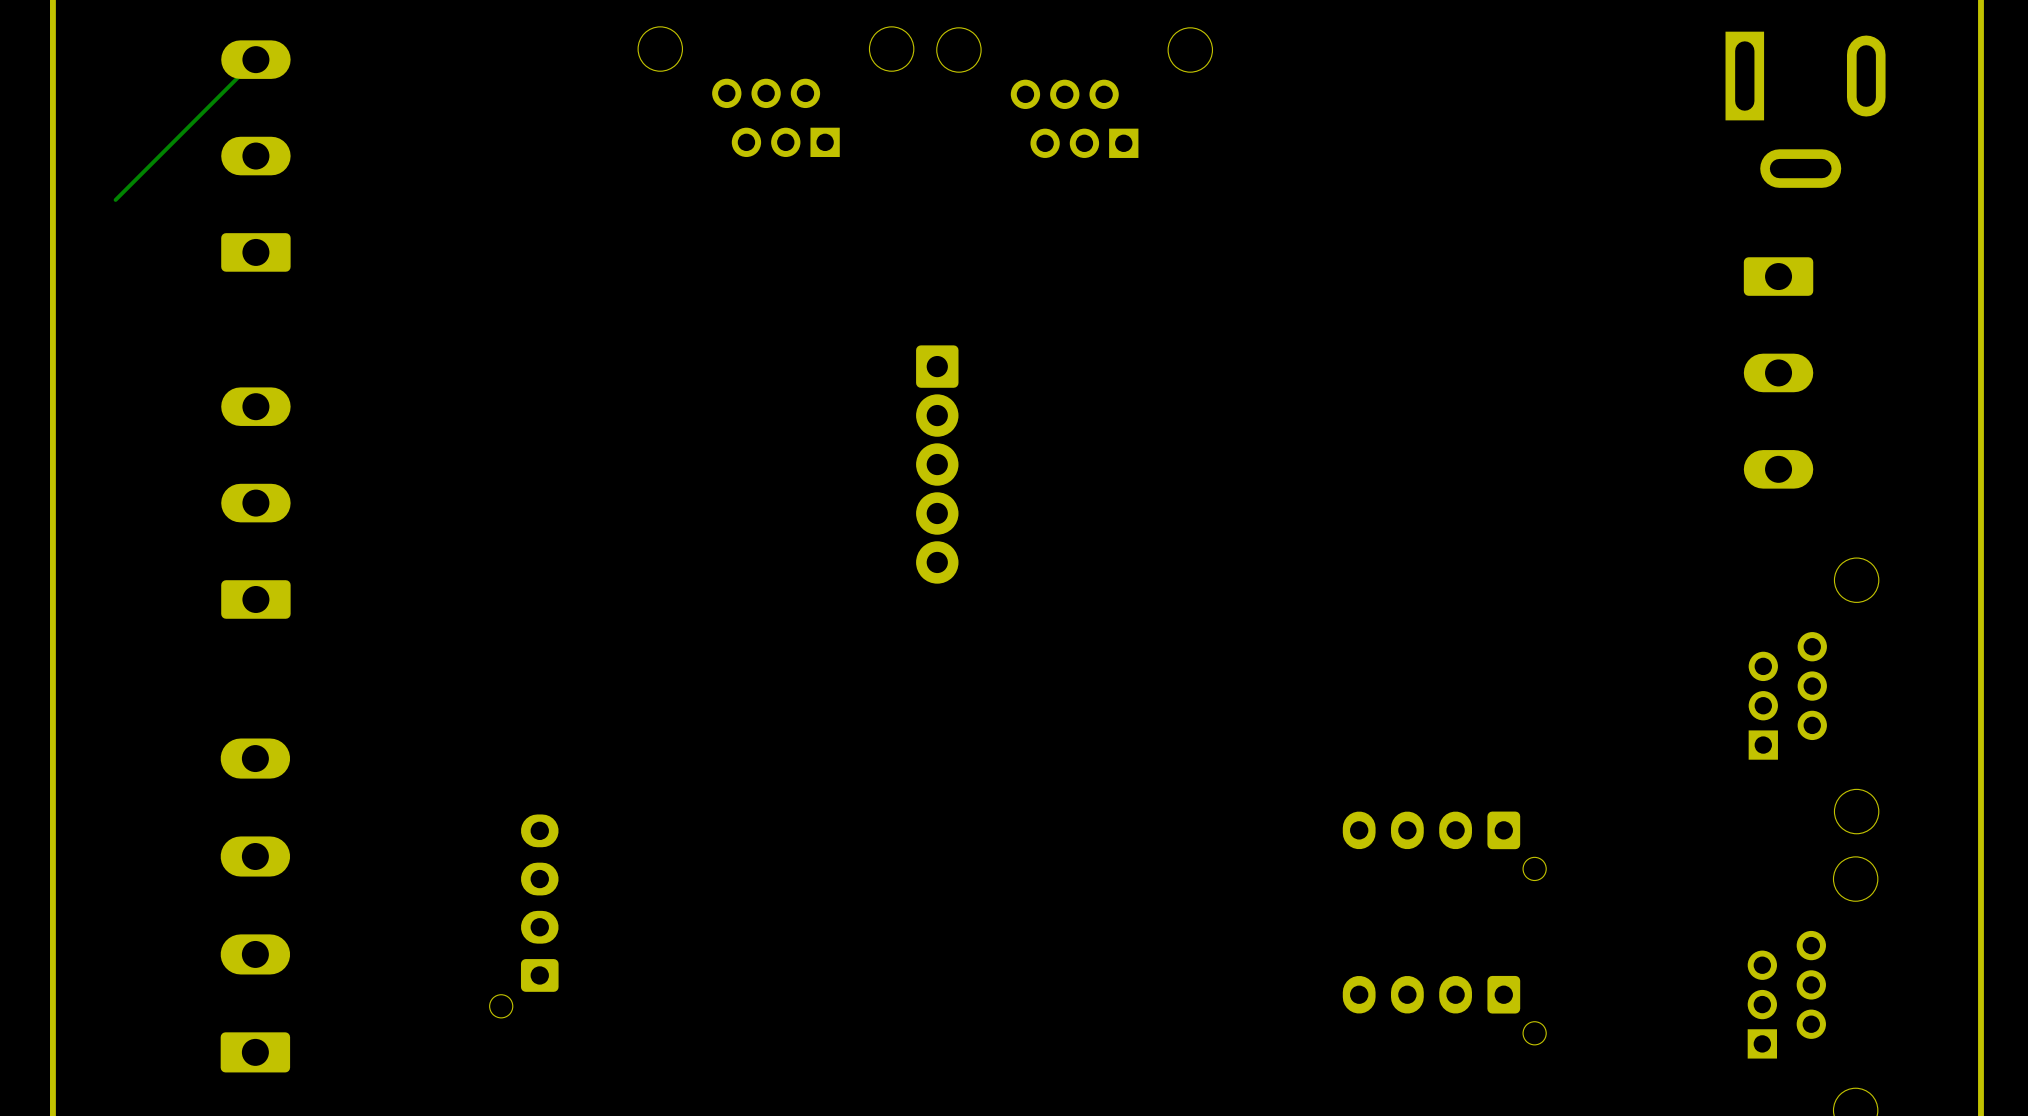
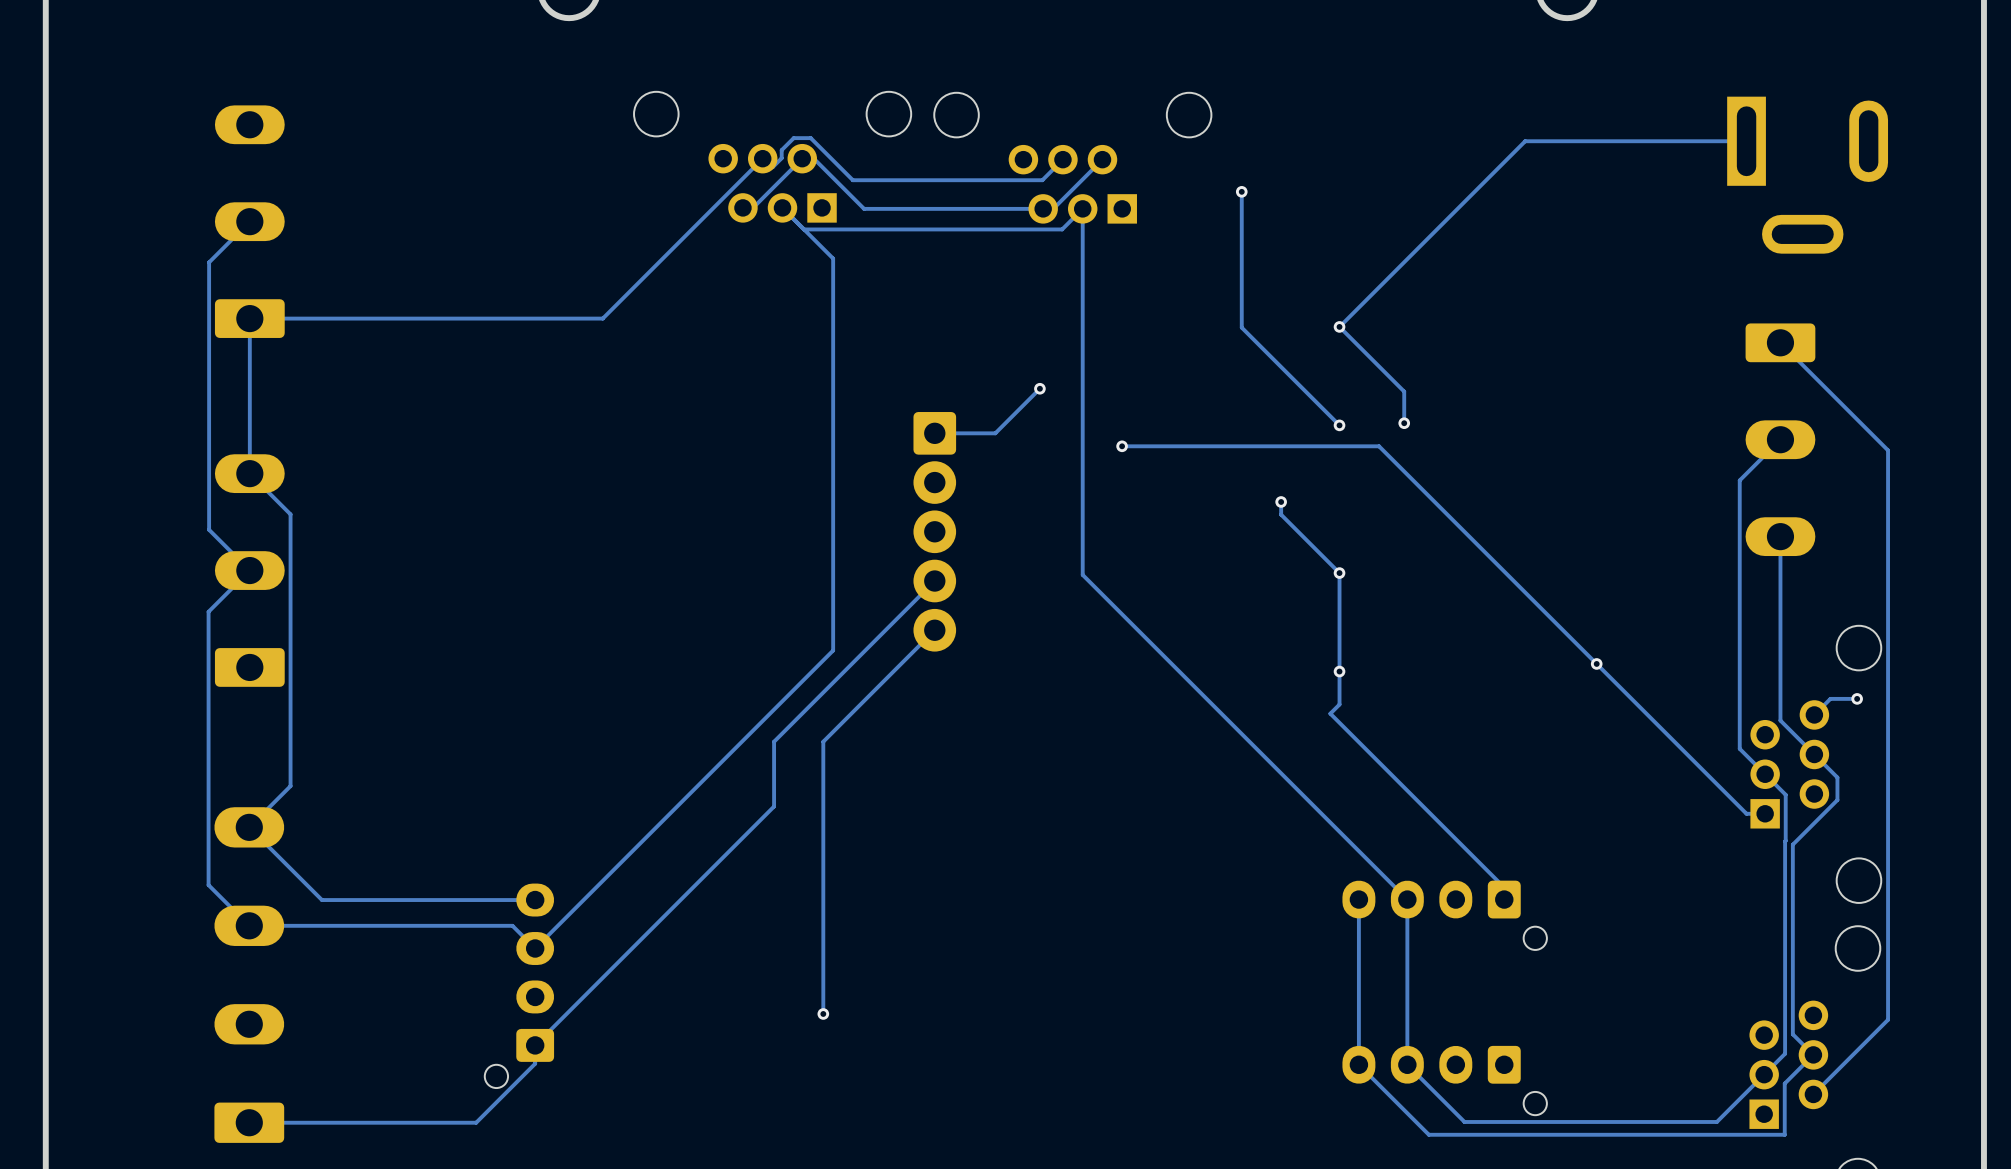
track: (255, 59) (115, 199) -> none
track: none -> (1746, 141) (1525, 141) (1339, 326) (1404, 391) (1404, 423)
track: none -> (1062, 159) (1042, 180) (852, 180) (810, 138) (793, 138) (781, 150) (781, 158) (772, 167) (762, 158) (602, 318) (249, 318) (249, 473) (290, 514) (290, 786) (249, 827) (321, 900) (535, 900)
track: none -> (1102, 159) (1053, 208) (864, 208) (813, 158) (802, 158) (753, 207) (742, 207)
track: none -> (1241, 191) (1241, 327) (1339, 425)
via: none -> (1241, 191)
track: none -> (782, 207) (833, 258) (833, 650) (535, 948) (512, 925) (249, 925) (208, 885) (208, 611) (249, 570) (209, 529) (209, 262) (249, 221)
track: none -> (804, 229) (1062, 229) (1082, 208) (1082, 574) (1407, 899) (1407, 1064) (1464, 1121) (1716, 1121) (1785, 1053) (1785, 794) (1739, 748) (1739, 480) (1780, 439)
via: none -> (1339, 326)
track: none -> (1780, 342) (1888, 450) (1888, 1019) (1813, 1094)
track: none -> (1039, 388) (995, 433) (934, 433)
via: none -> (1039, 388)
via: none -> (1404, 423)
via: none -> (1339, 425)
track: none -> (1122, 446) (1379, 446) (1746, 813) (1765, 813)
via: none -> (1122, 446)
track: none -> (1281, 501) (1281, 514) (1339, 573) (1339, 704) (1330, 713) (1504, 887) (1504, 899)
via: none -> (1281, 501)
track: none -> (1780, 536) (1780, 720) (1837, 777) (1837, 800) (1792, 844) (1792, 1034) (1813, 1054) (1784, 1083) (1784, 1134) (1428, 1134) (1358, 1064) (1358, 899)
via: none -> (1339, 573)
track: none -> (934, 581) (774, 741) (774, 806) (535, 1045) (535, 1063) (476, 1122) (249, 1122)
track: none -> (934, 630) (823, 741) (823, 1013)
via: none -> (1596, 663)
via: none -> (1339, 671)
track: none -> (1857, 698) (1830, 698) (1814, 714)
via: none -> (1857, 698)
via: none -> (823, 1013)

